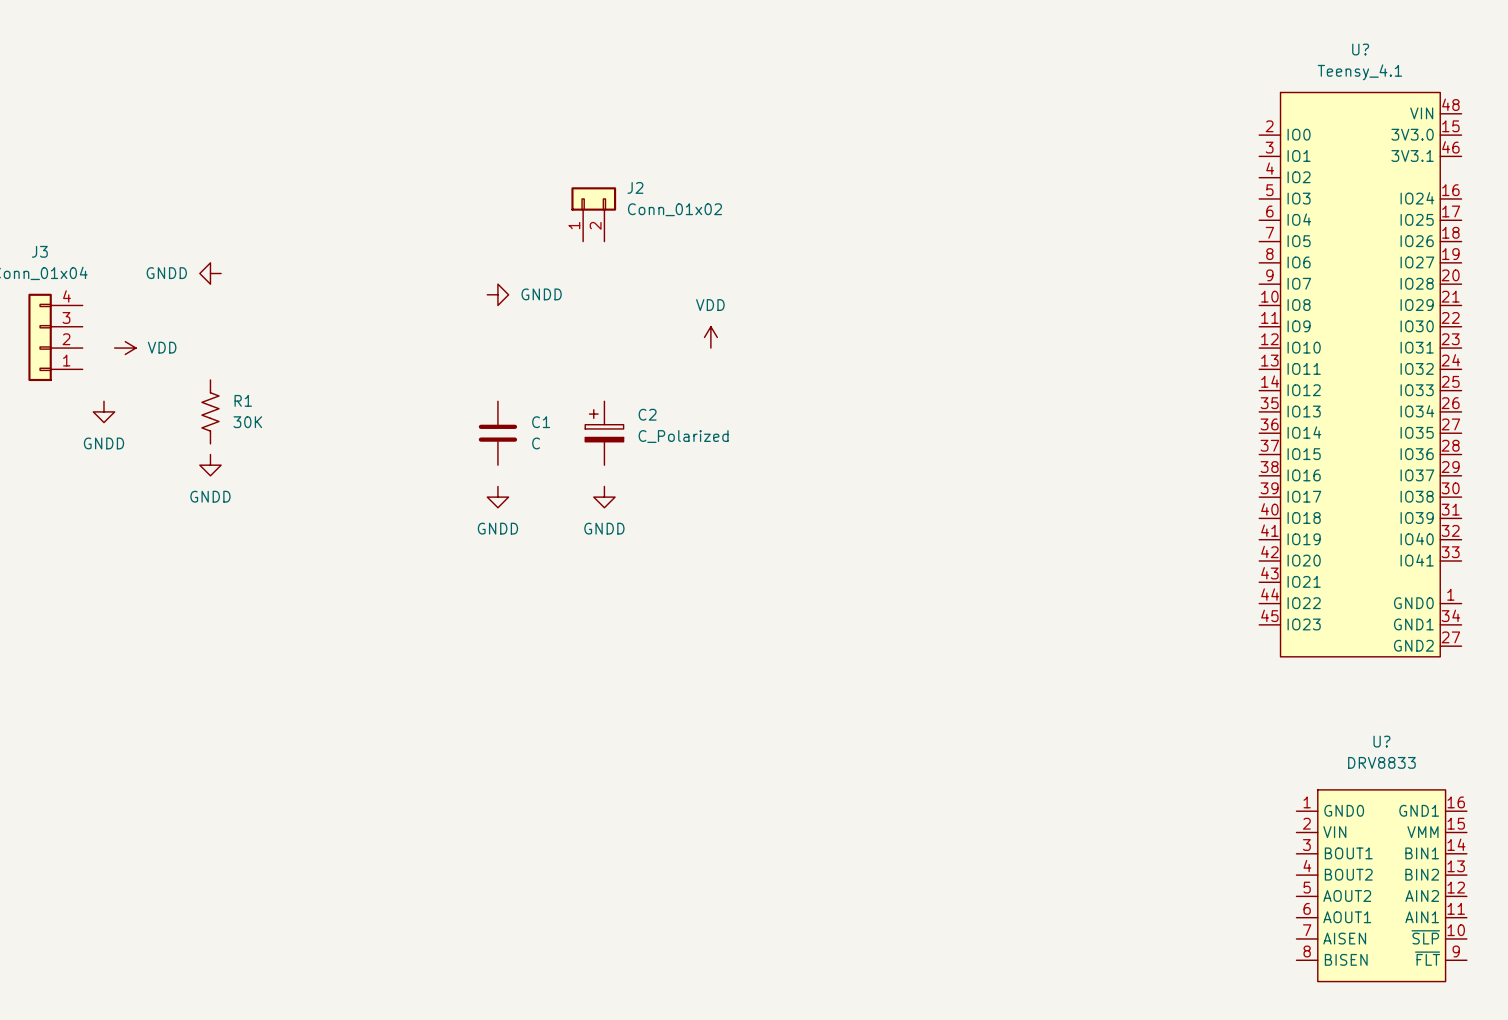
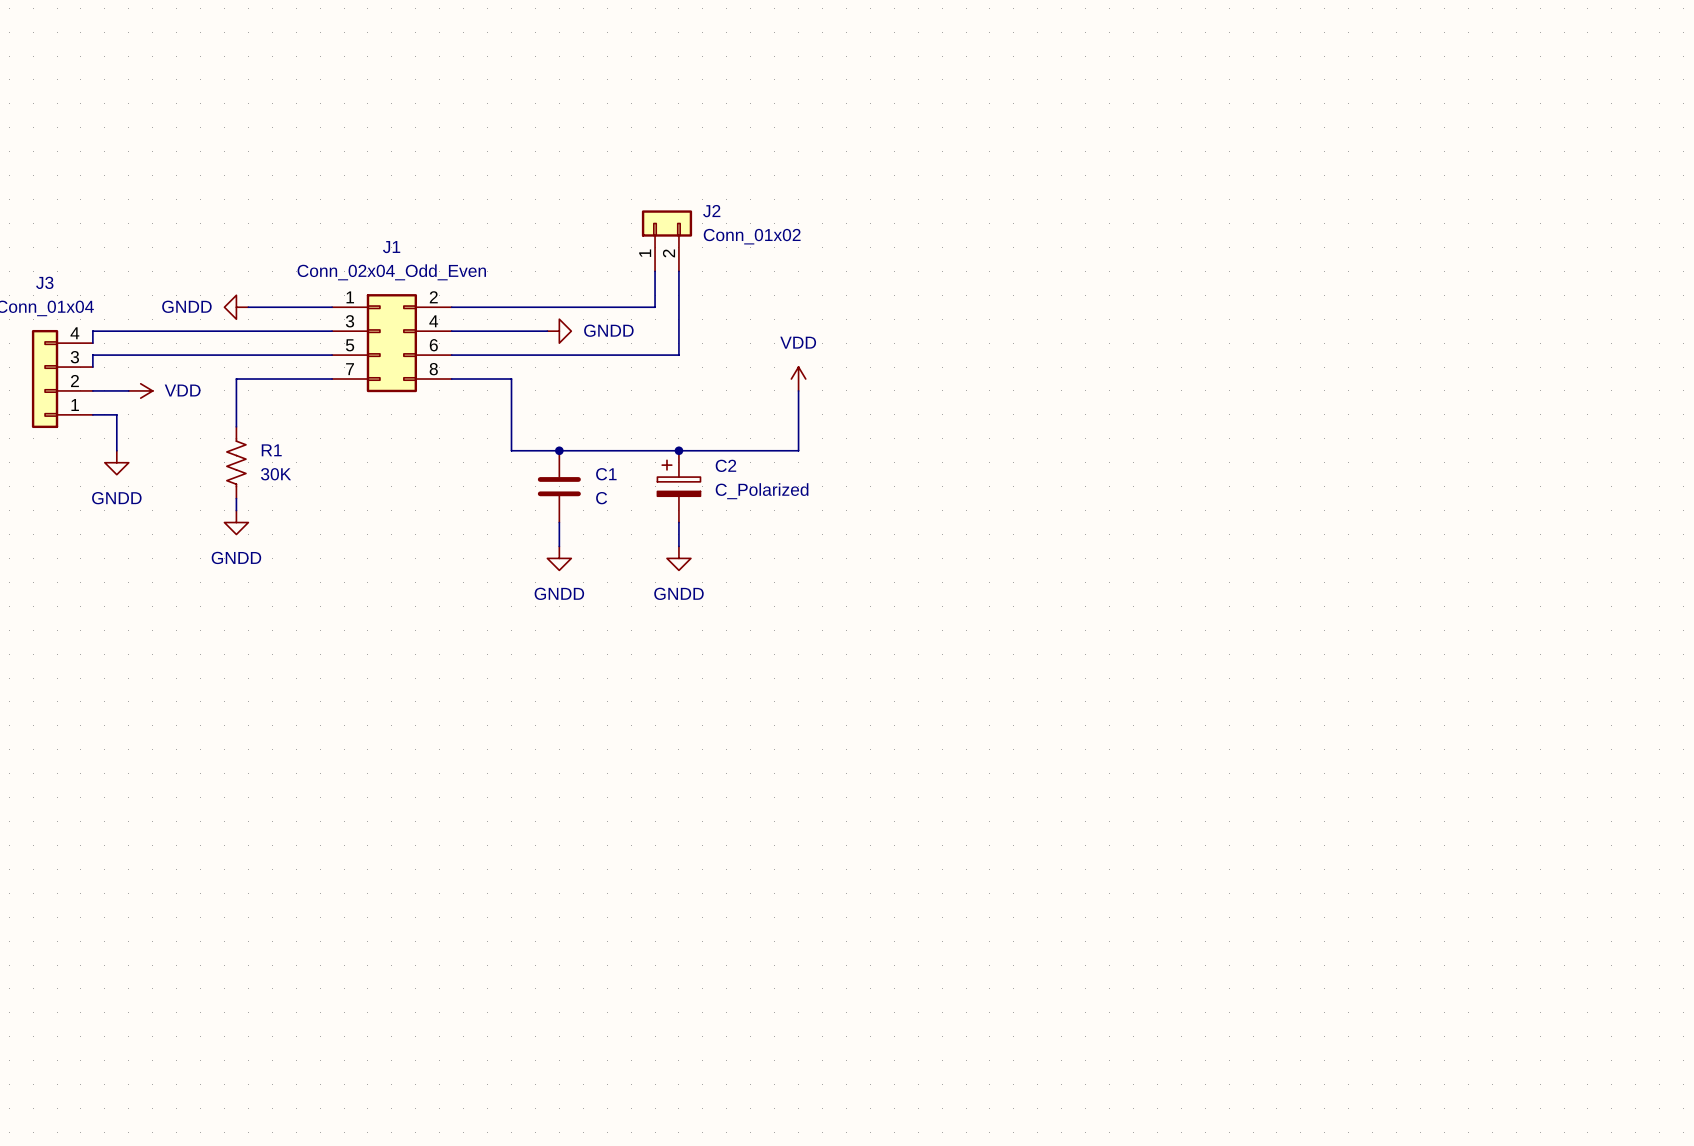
wire: none -> (655, 271) (655, 307) (451, 307)
wire: none -> (678, 271) (678, 355) (451, 355)
wire: none -> (248, 307) (332, 307)
wire: none -> (332, 331) (92, 331) (92, 343)
wire: none -> (451, 331) (547, 331)
J1: none -> Conn_02x04_Odd_Even (391, 343)
wire: none -> (332, 355) (92, 355) (92, 367)
wire: none -> (332, 379) (236, 379) (236, 426)
wire: none -> (451, 379) (511, 379) (511, 450) (798, 450) (798, 390)
wire: none -> (92, 390) (128, 390)
wire: none -> (92, 414) (116, 414) (116, 450)
U?: Teensy_4.1 (1360, 374) -> none
junction: none -> (559, 450)
junction: none -> (678, 450)
wire: none -> (236, 498) (236, 510)
wire: none -> (559, 522) (559, 546)
wire: none -> (678, 522) (678, 546)
U?: DRV8833 (1381, 885) -> none

